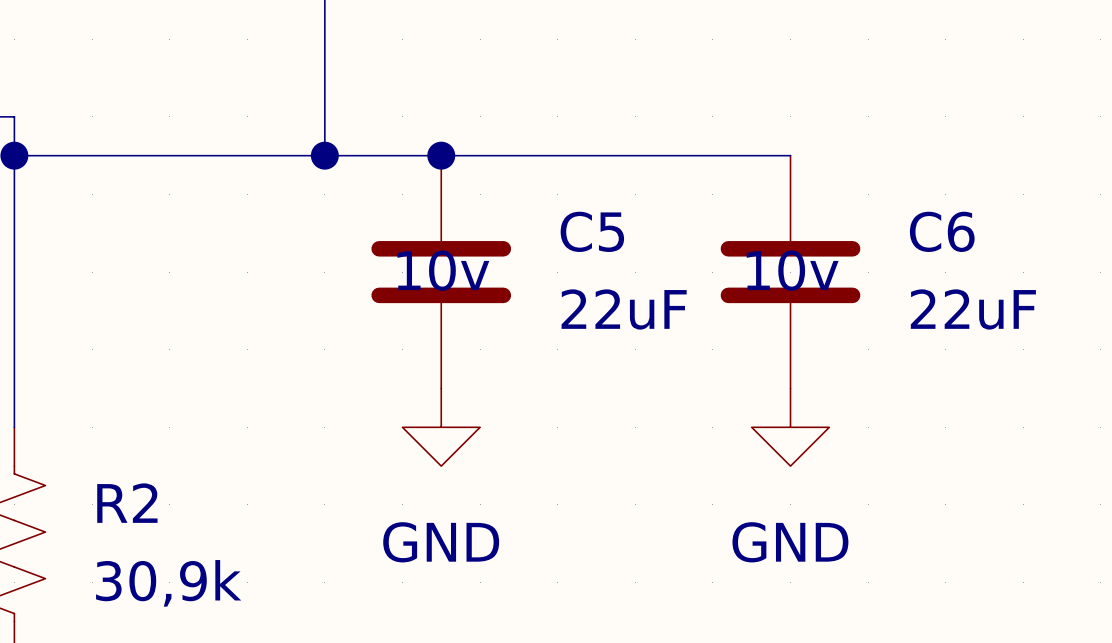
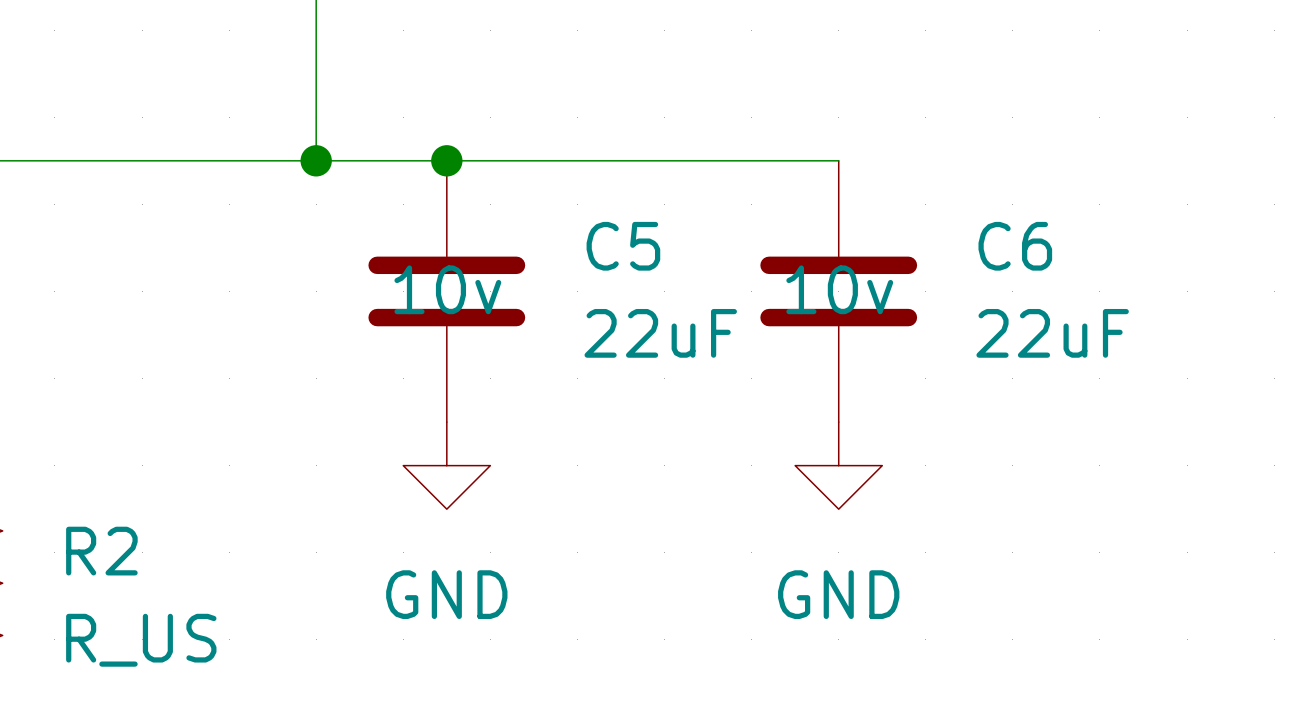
R2 value: 30,9k (168, 583) -> R_US (141, 640)

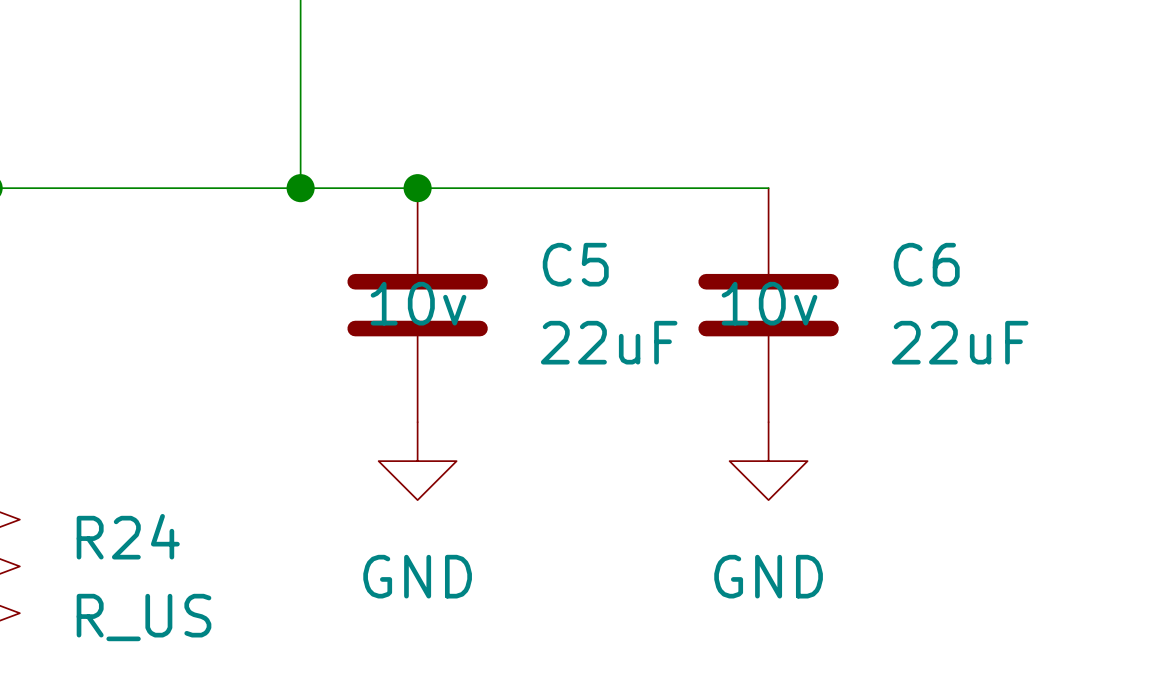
R2 name: R2 (101, 551) -> R24 (128, 536)

